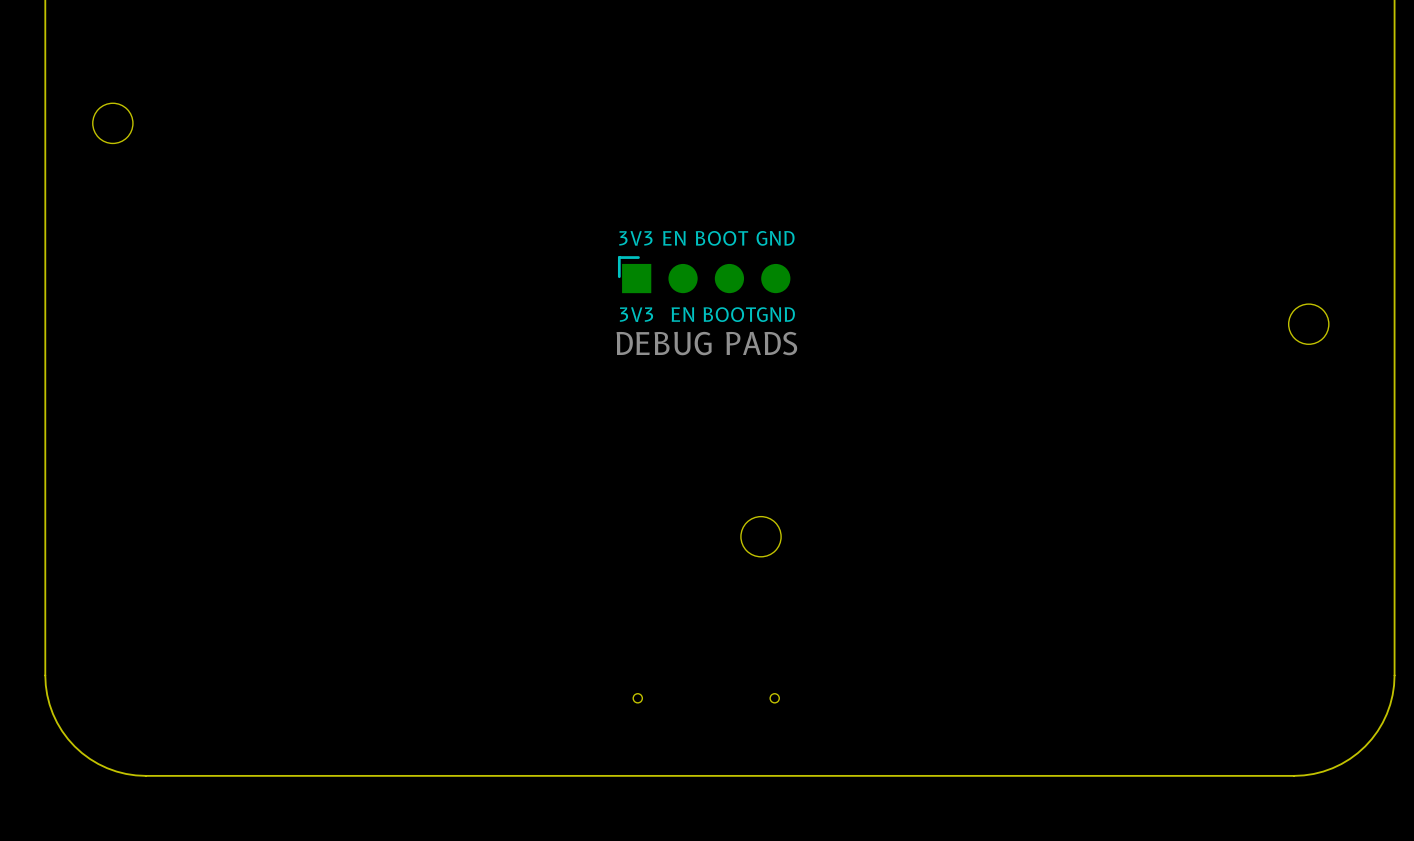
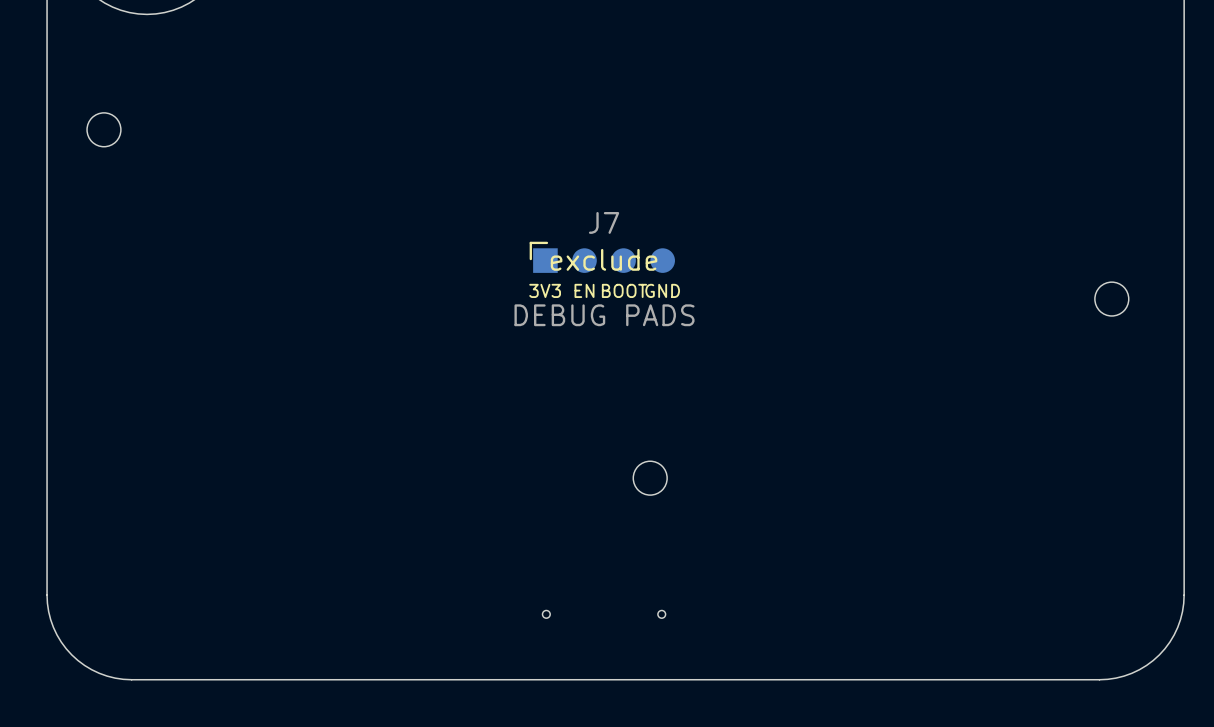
J7 name: none -> J7 (604, 222)
text: 3V3 EN BOOT GND (706, 238) -> none
J7 text: none -> exclude (604, 259)

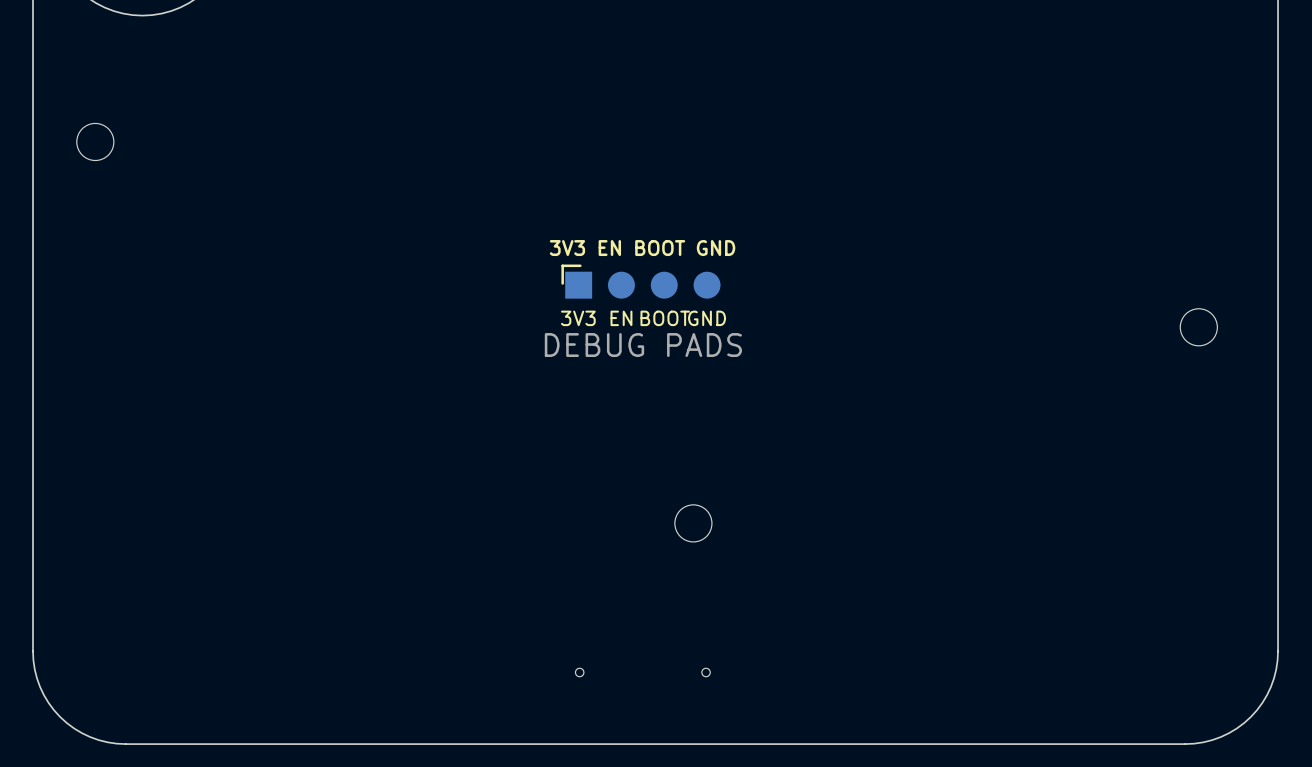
J7 name: J7 (604, 222) -> none
text: none -> 3V3 EN BOOT GND (642, 248)
J7 text: exclude (604, 259) -> none

